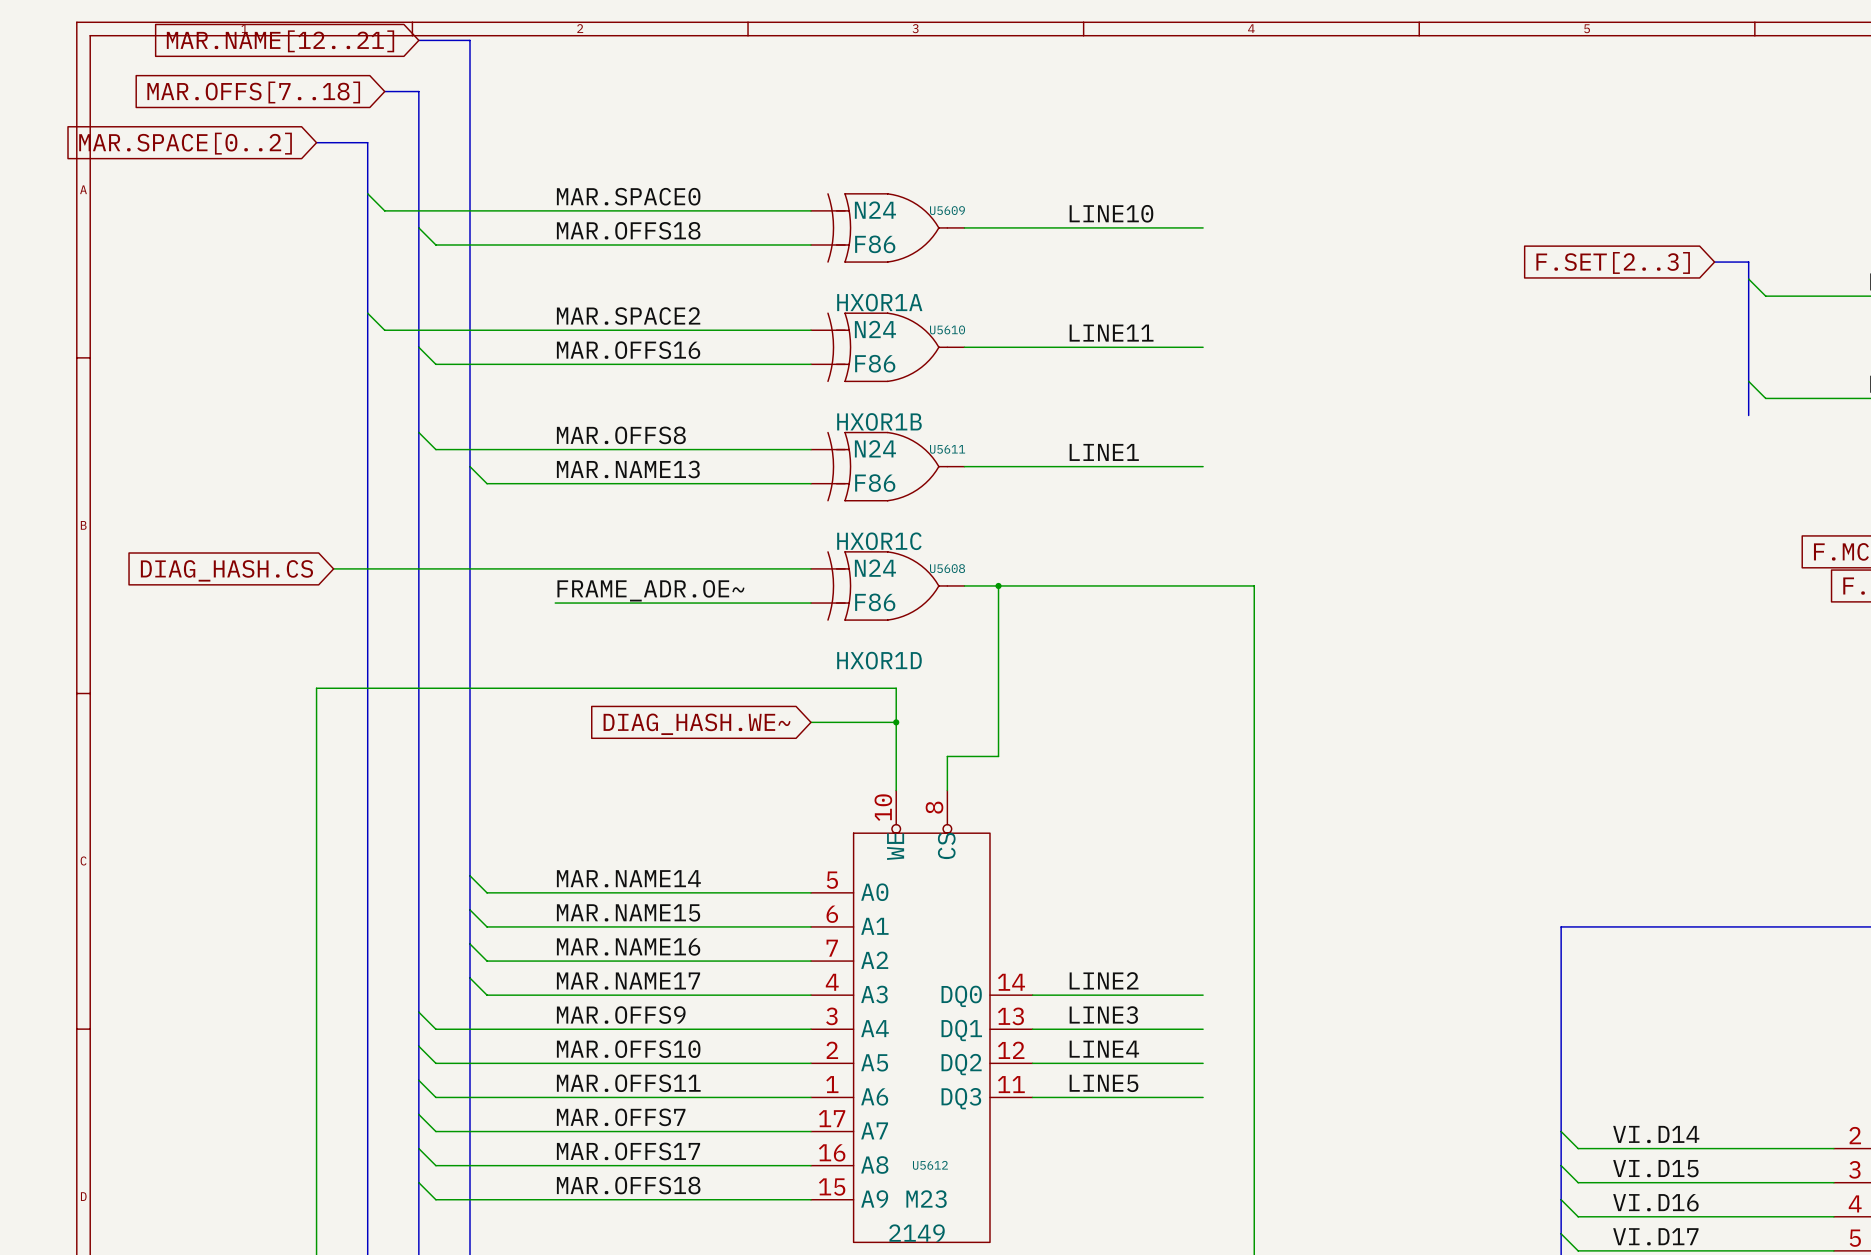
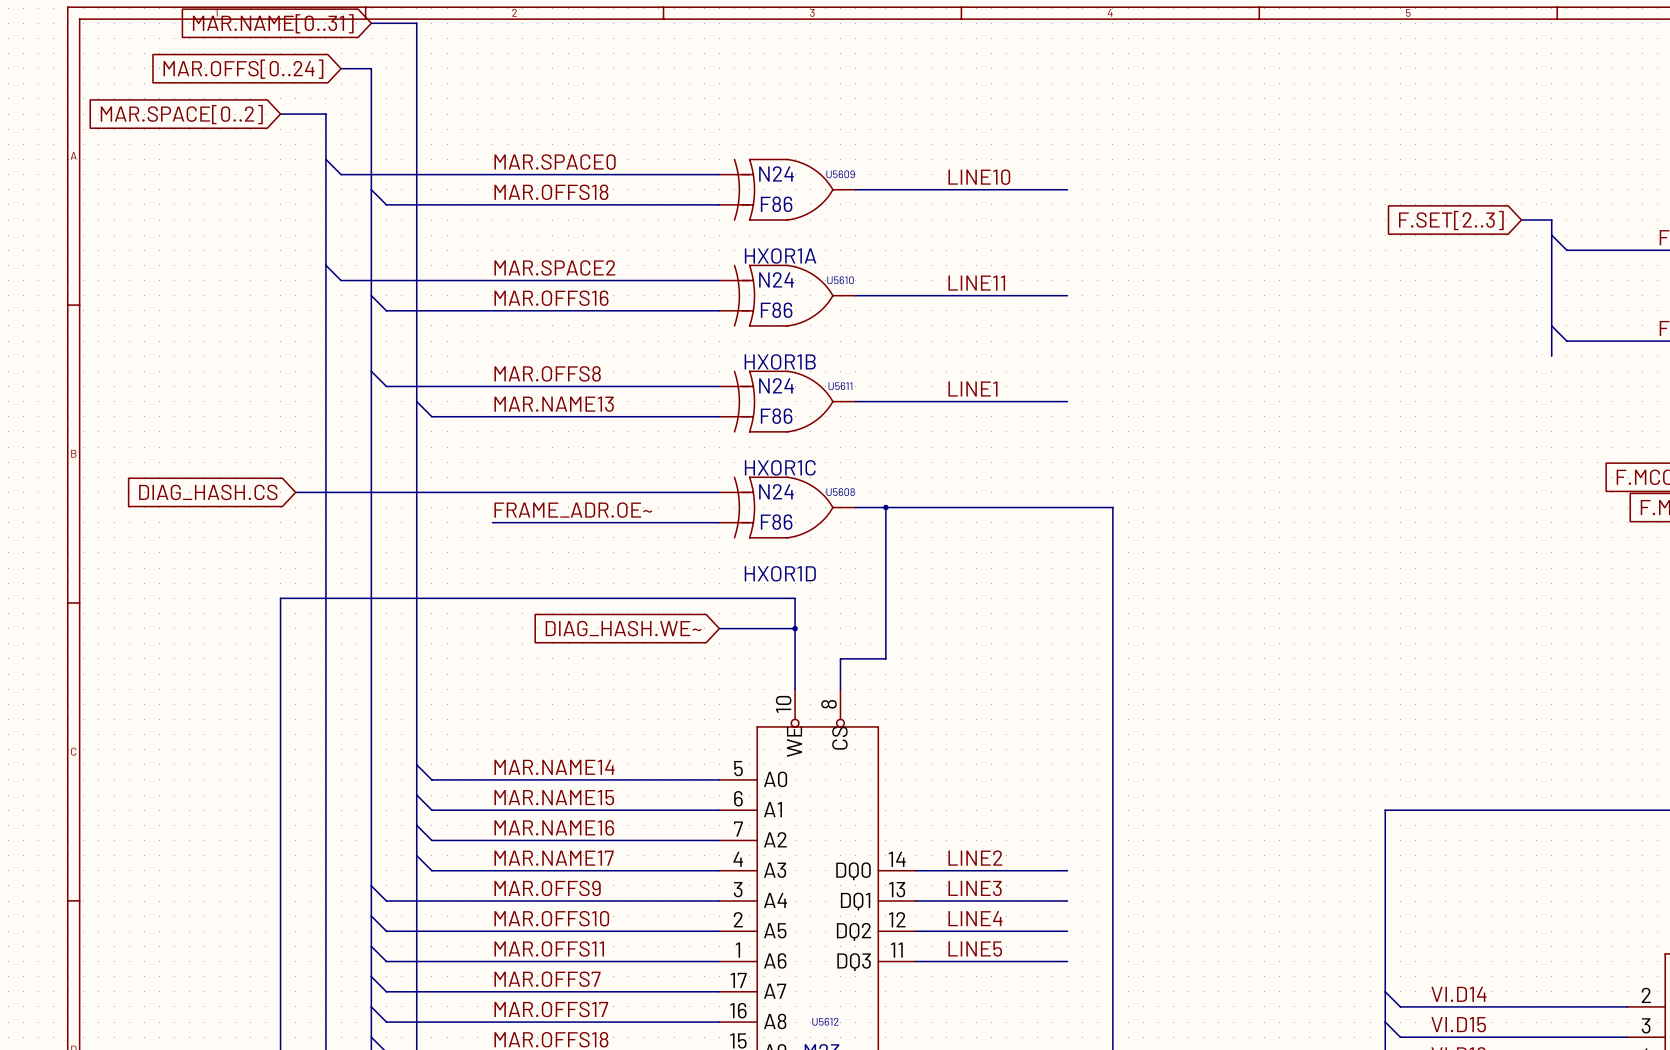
global label: MAR.NAME[12..21] (280, 41) -> MAR.NAME[0..31] (273, 23)
global label: MAR.OFFS[7..18] (253, 92) -> MAR.OFFS[0..24] (243, 69)

